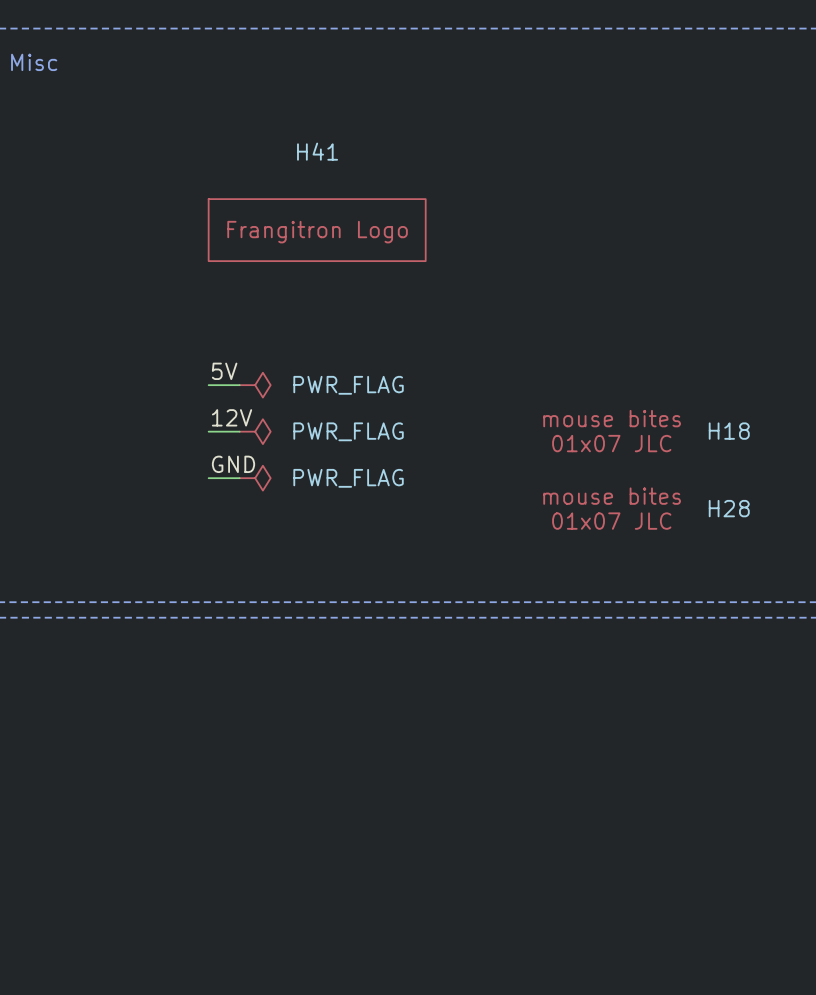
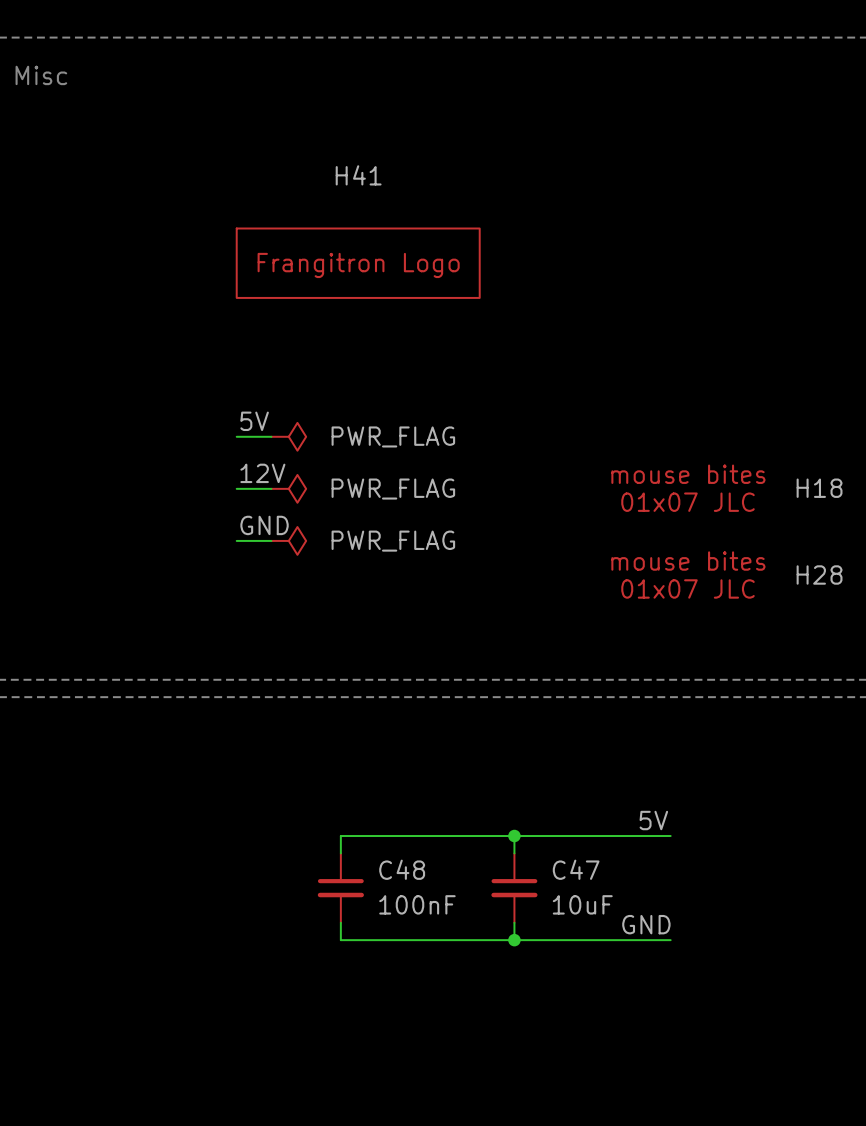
label: none -> 5V (653, 820)
wire: none -> (514, 836) (514, 853)
junction: none -> (514, 836)
wire: none -> (670, 836) (340, 836) (340, 853)
C48: none -> 100nF (340, 888)
C47: none -> 10uF (514, 888)
wire: none -> (340, 922) (340, 940) (670, 940)
wire: none -> (514, 922) (514, 940)
label: none -> GND (646, 924)
junction: none -> (514, 940)

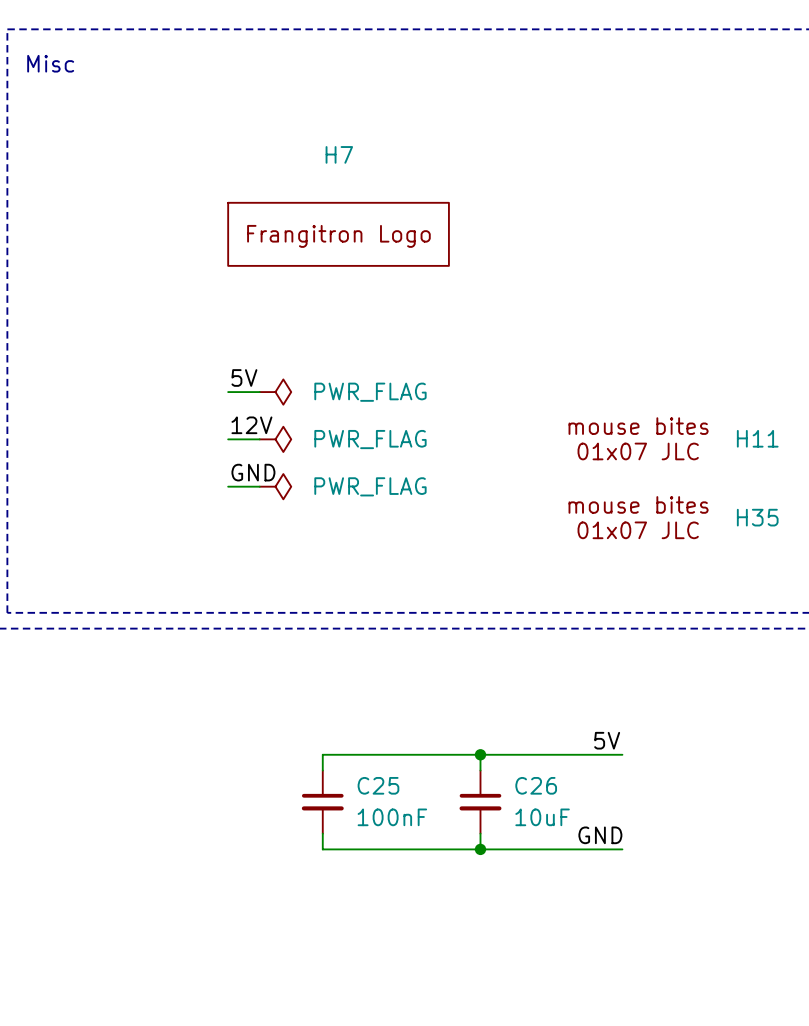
H41 name: H41 (358, 175) -> H7 (339, 154)
H18 name: H18 (819, 488) -> H11 (757, 438)
H28 name: H28 (819, 575) -> H35 (757, 517)
C48 name: C48 (402, 869) -> C25 (378, 785)
C47 name: C47 (576, 869) -> C26 (536, 785)

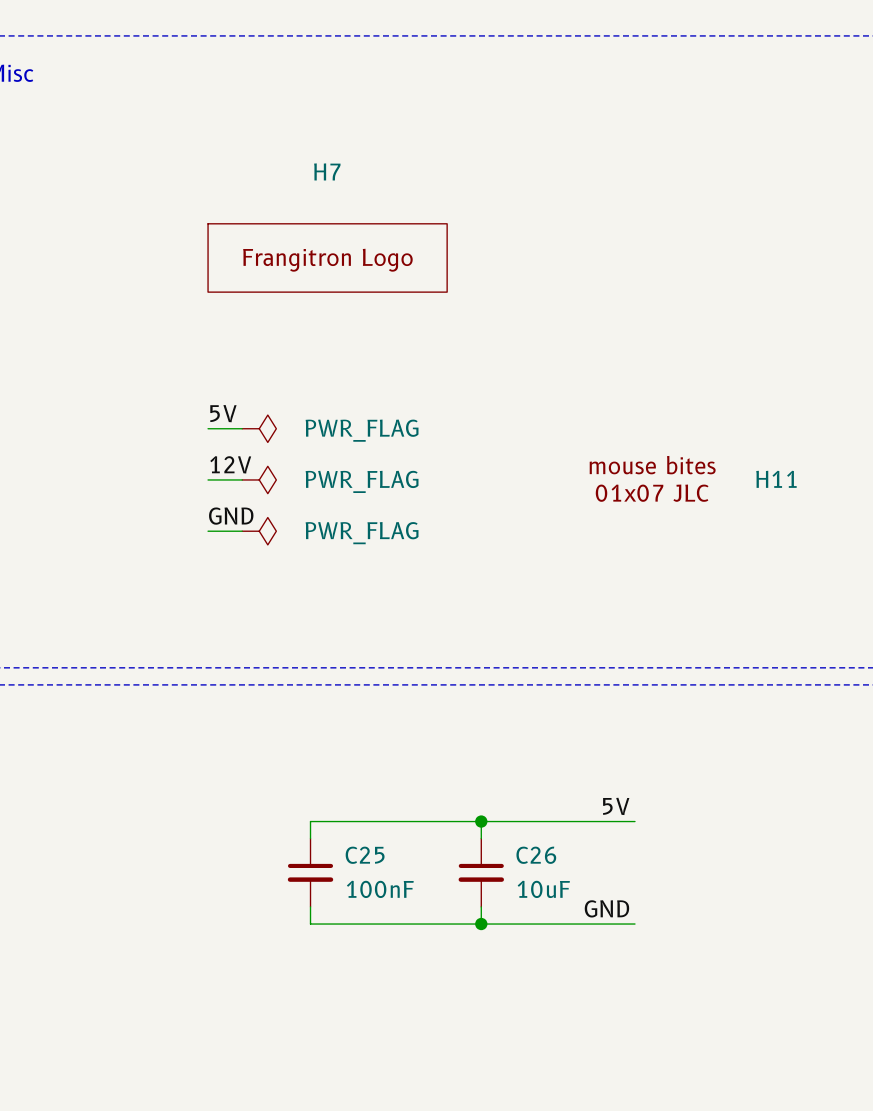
H35: (673, 517) -> none

